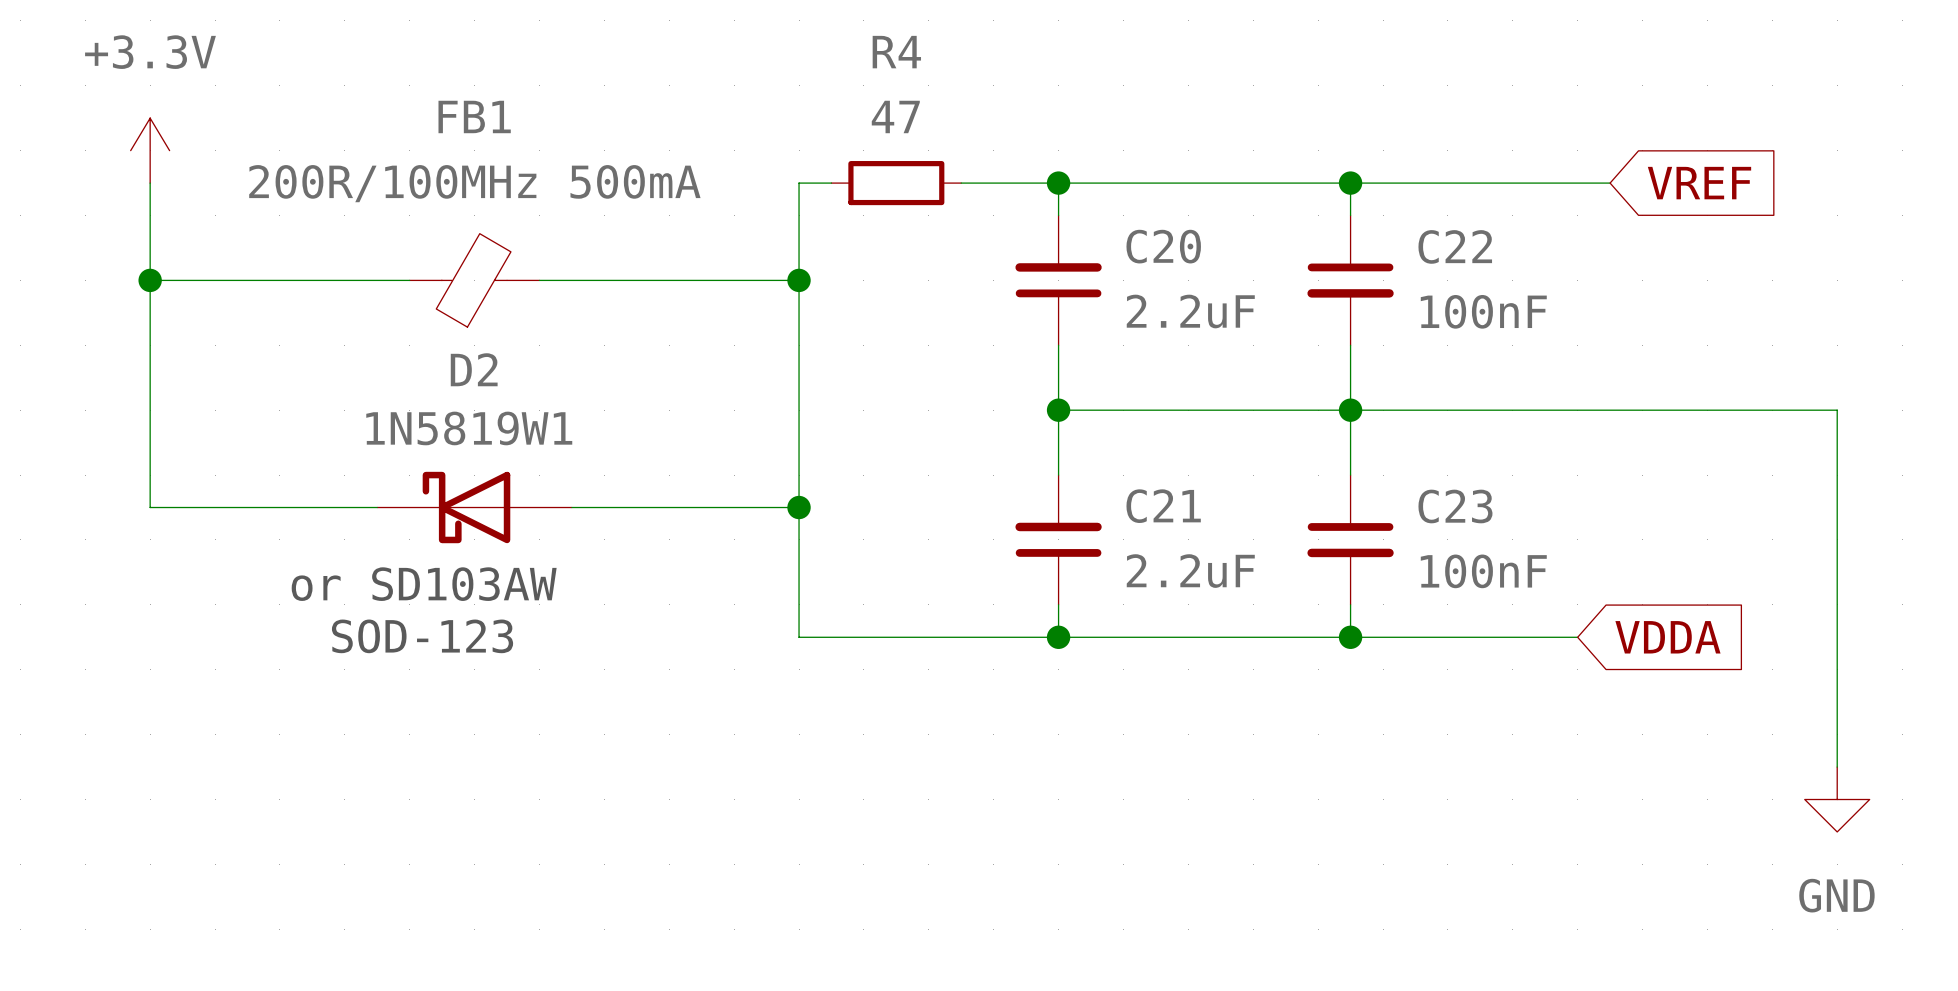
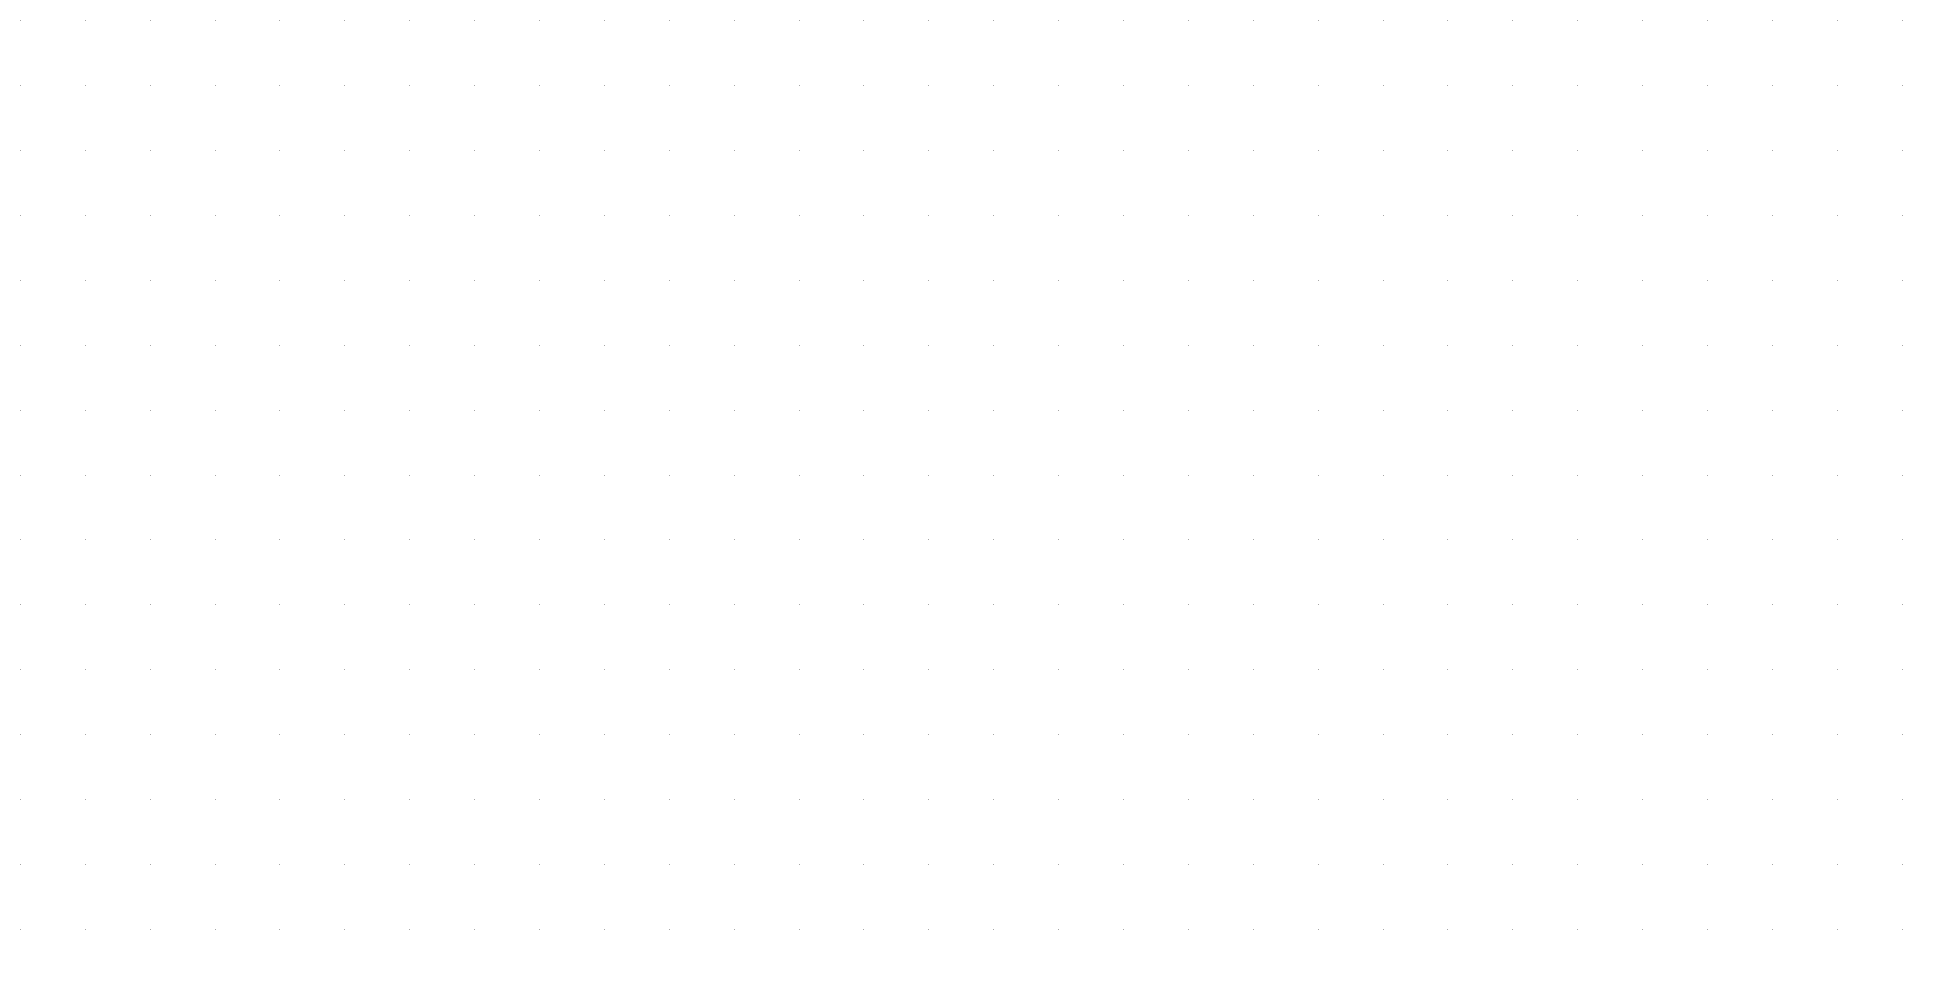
power symbol: +3.3V (150, 150) -> none
wire: (150, 183) (150, 507) (377, 507) -> none
wire: (831, 183) (799, 183) (799, 637) (1577, 637) -> none
R4: 47 (896, 183) -> none
wire: (961, 183) (1610, 183) -> none
wire: (1058, 183) (1058, 215) -> none
junction: (1058, 183) -> none
wire: (1350, 183) (1350, 215) -> none
junction: (1350, 183) -> none
global label: VREF (1699, 183) -> none
wire: (150, 280) (409, 280) -> none
junction: (150, 280) -> none
FB1: 200R/100MHz 500mA (474, 280) -> none
wire: (539, 280) (799, 280) -> none
junction: (799, 280) -> none
C20: 2.2uF (1058, 280) -> none
C22: 100nF (1350, 280) -> none
wire: (1058, 345) (1058, 475) -> none
wire: (1350, 345) (1350, 475) -> none
wire: (1058, 410) (1837, 410) (1837, 767) -> none
junction: (1058, 410) -> none
junction: (1350, 410) -> none
D2: 1N5819W1 (474, 507) -> none
wire: (571, 507) (799, 507) -> none
junction: (799, 507) -> none
C21: 2.2uF (1058, 539) -> none
C23: 100nF (1350, 539) -> none
text: or SD103AW (424, 584) -> none
wire: (1058, 604) (1058, 637) -> none
wire: (1350, 604) (1350, 637) -> none
text: SOD-123 (422, 636) -> none
junction: (1058, 637) -> none
junction: (1350, 637) -> none
global label: VDDA (1667, 637) -> none
power symbol: GND (1837, 799) -> none

